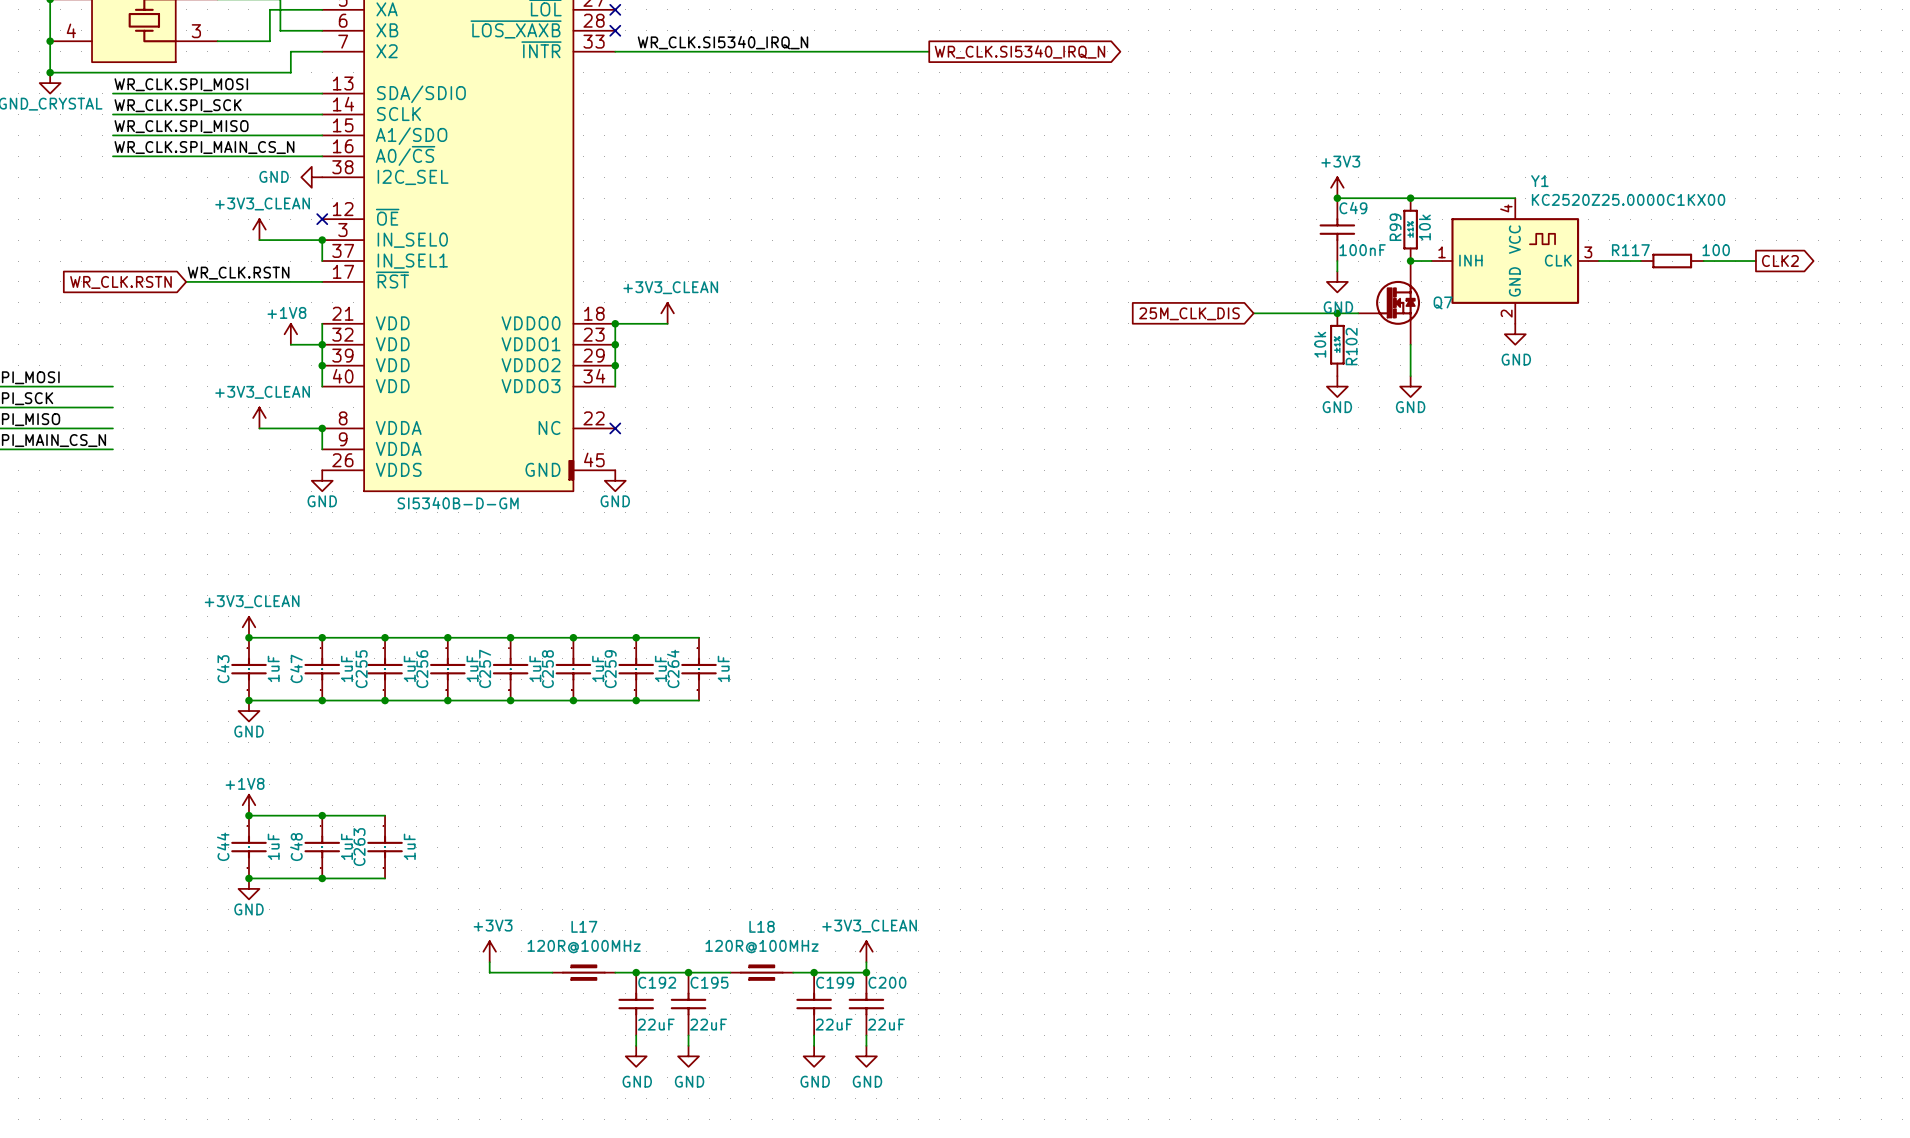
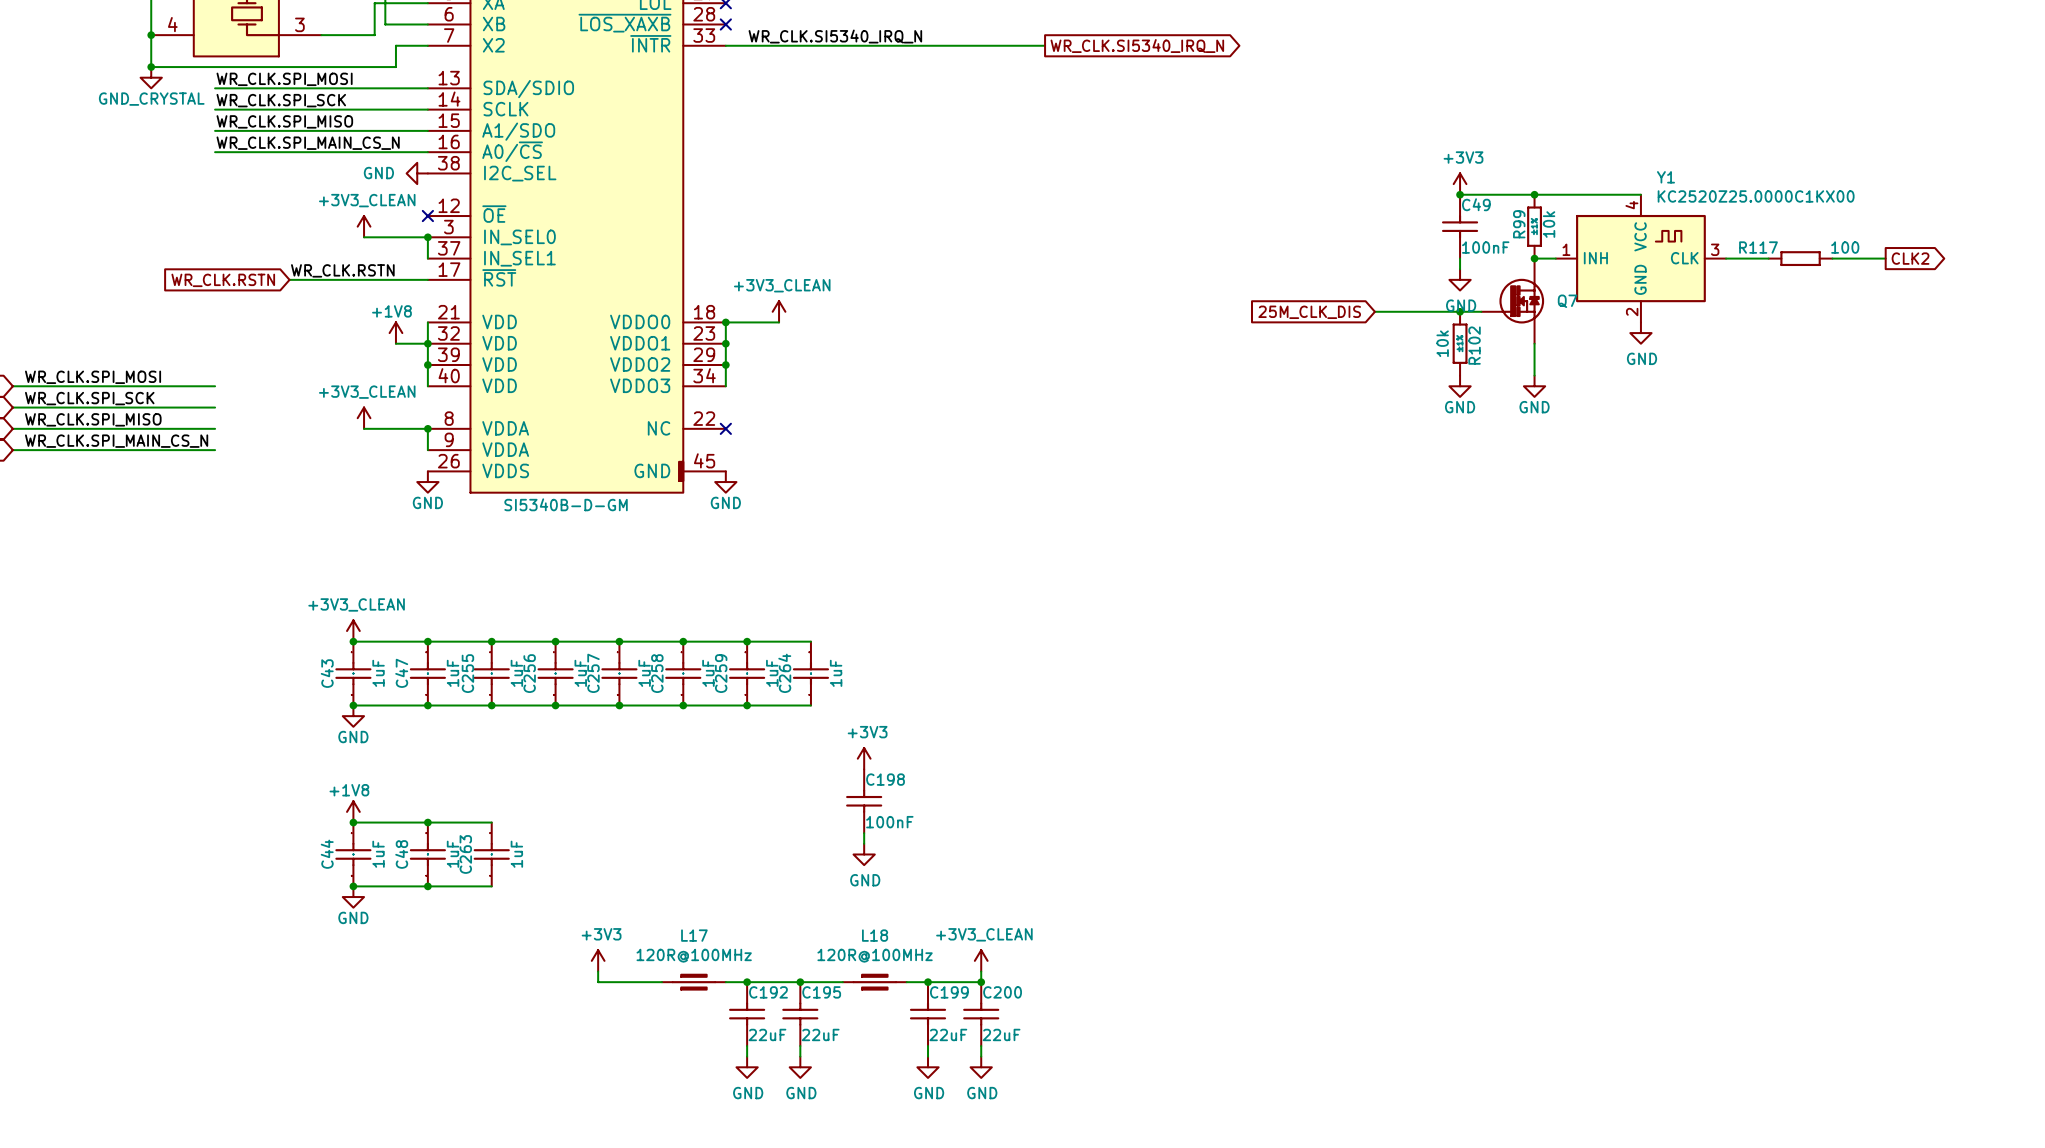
power symbol: none -> +3V3 (864, 758)
C198: none -> (864, 801)
wire: none -> (864, 833) (864, 843)
power symbol: none -> GND (864, 854)

